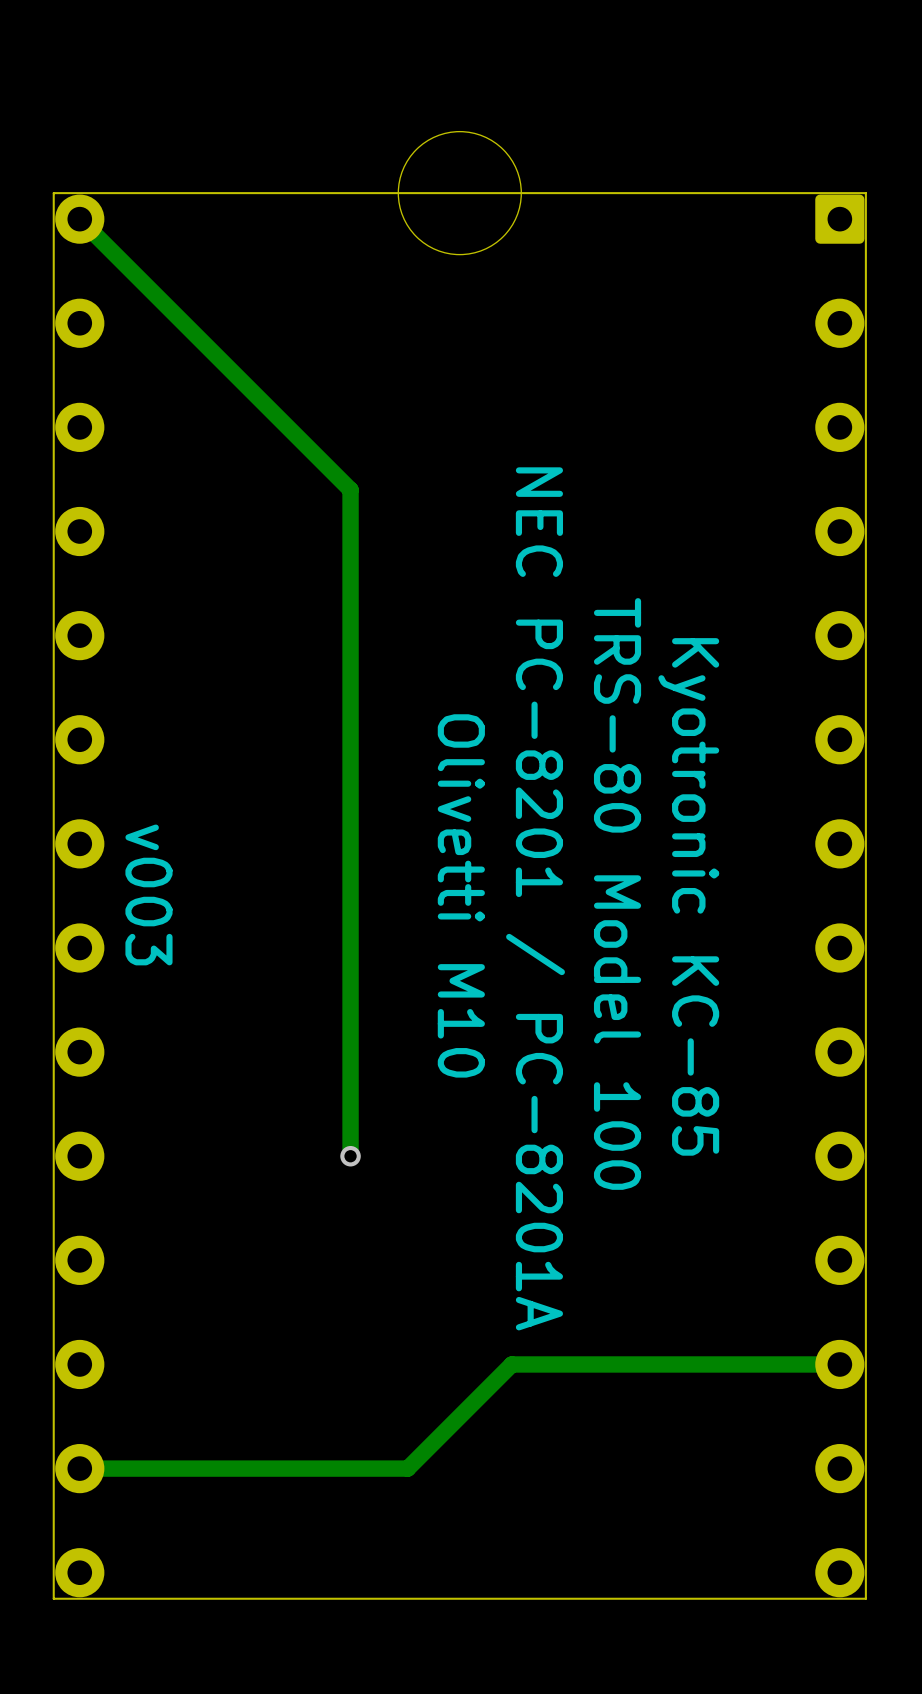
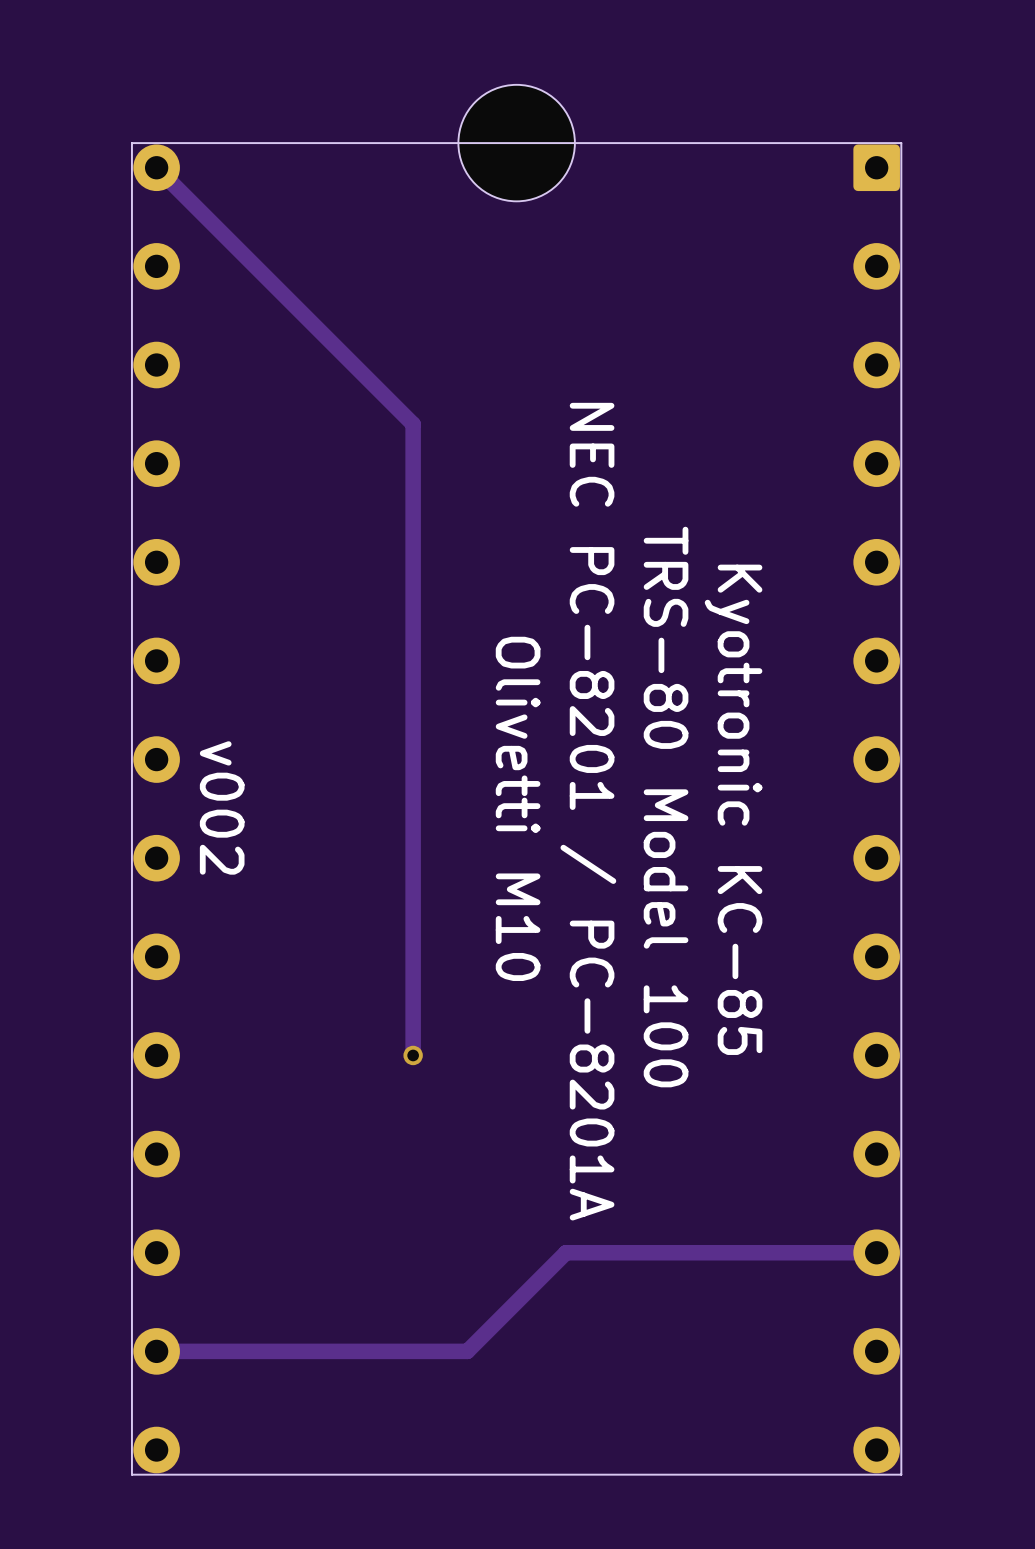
text: v003 (148, 894) -> v002 (222, 807)

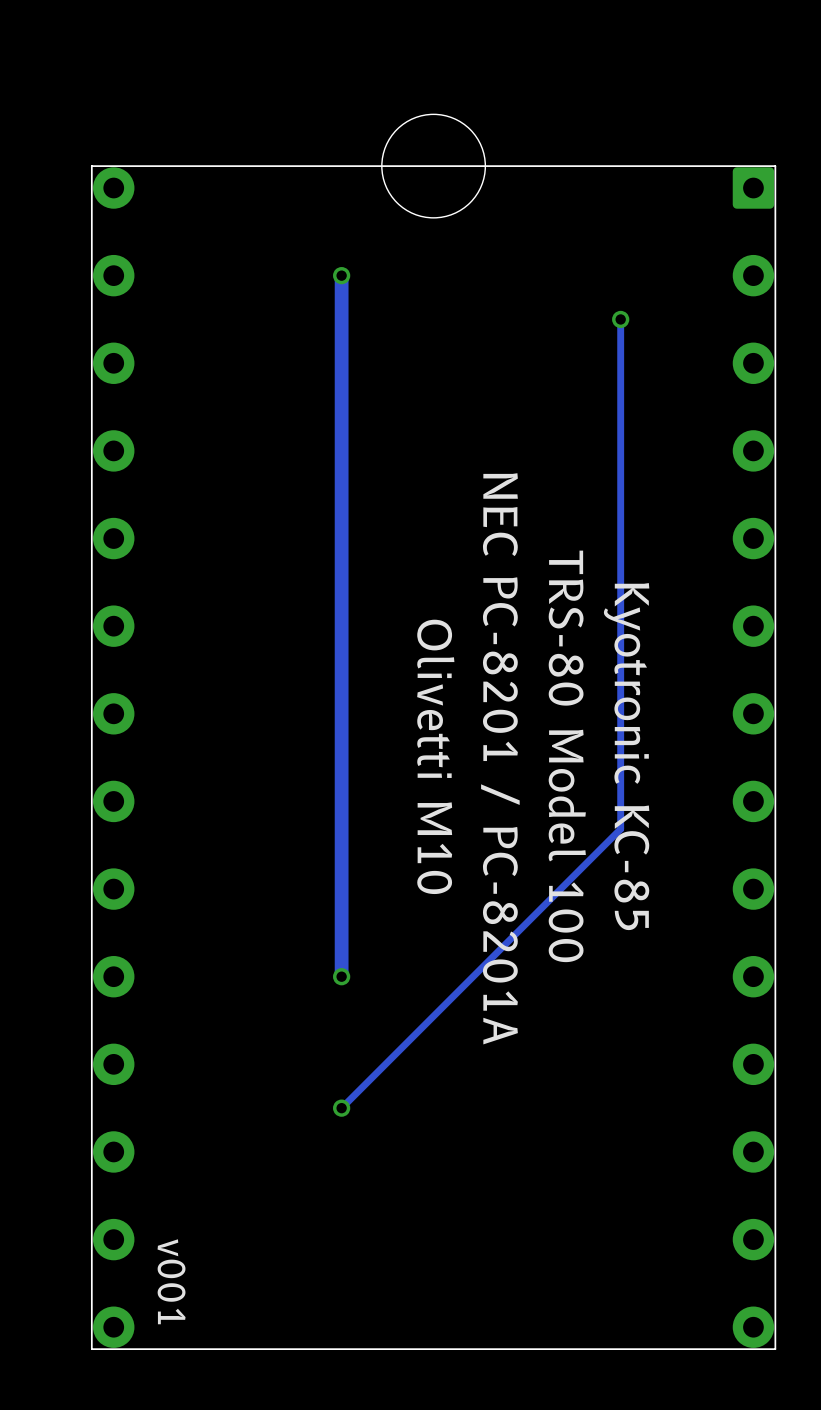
track: (156, 167) (413, 424) -> (341, 275) (341, 415)
via: none -> (341, 275)
track: none -> (620, 319) (620, 829) (341, 1108)
via: none -> (620, 319)
text: v002 (222, 807) -> none
via: none -> (341, 1108)
track: (876, 1252) (565, 1252) (467, 1351) (156, 1351) -> none
text: none -> v001 (171, 1281)

